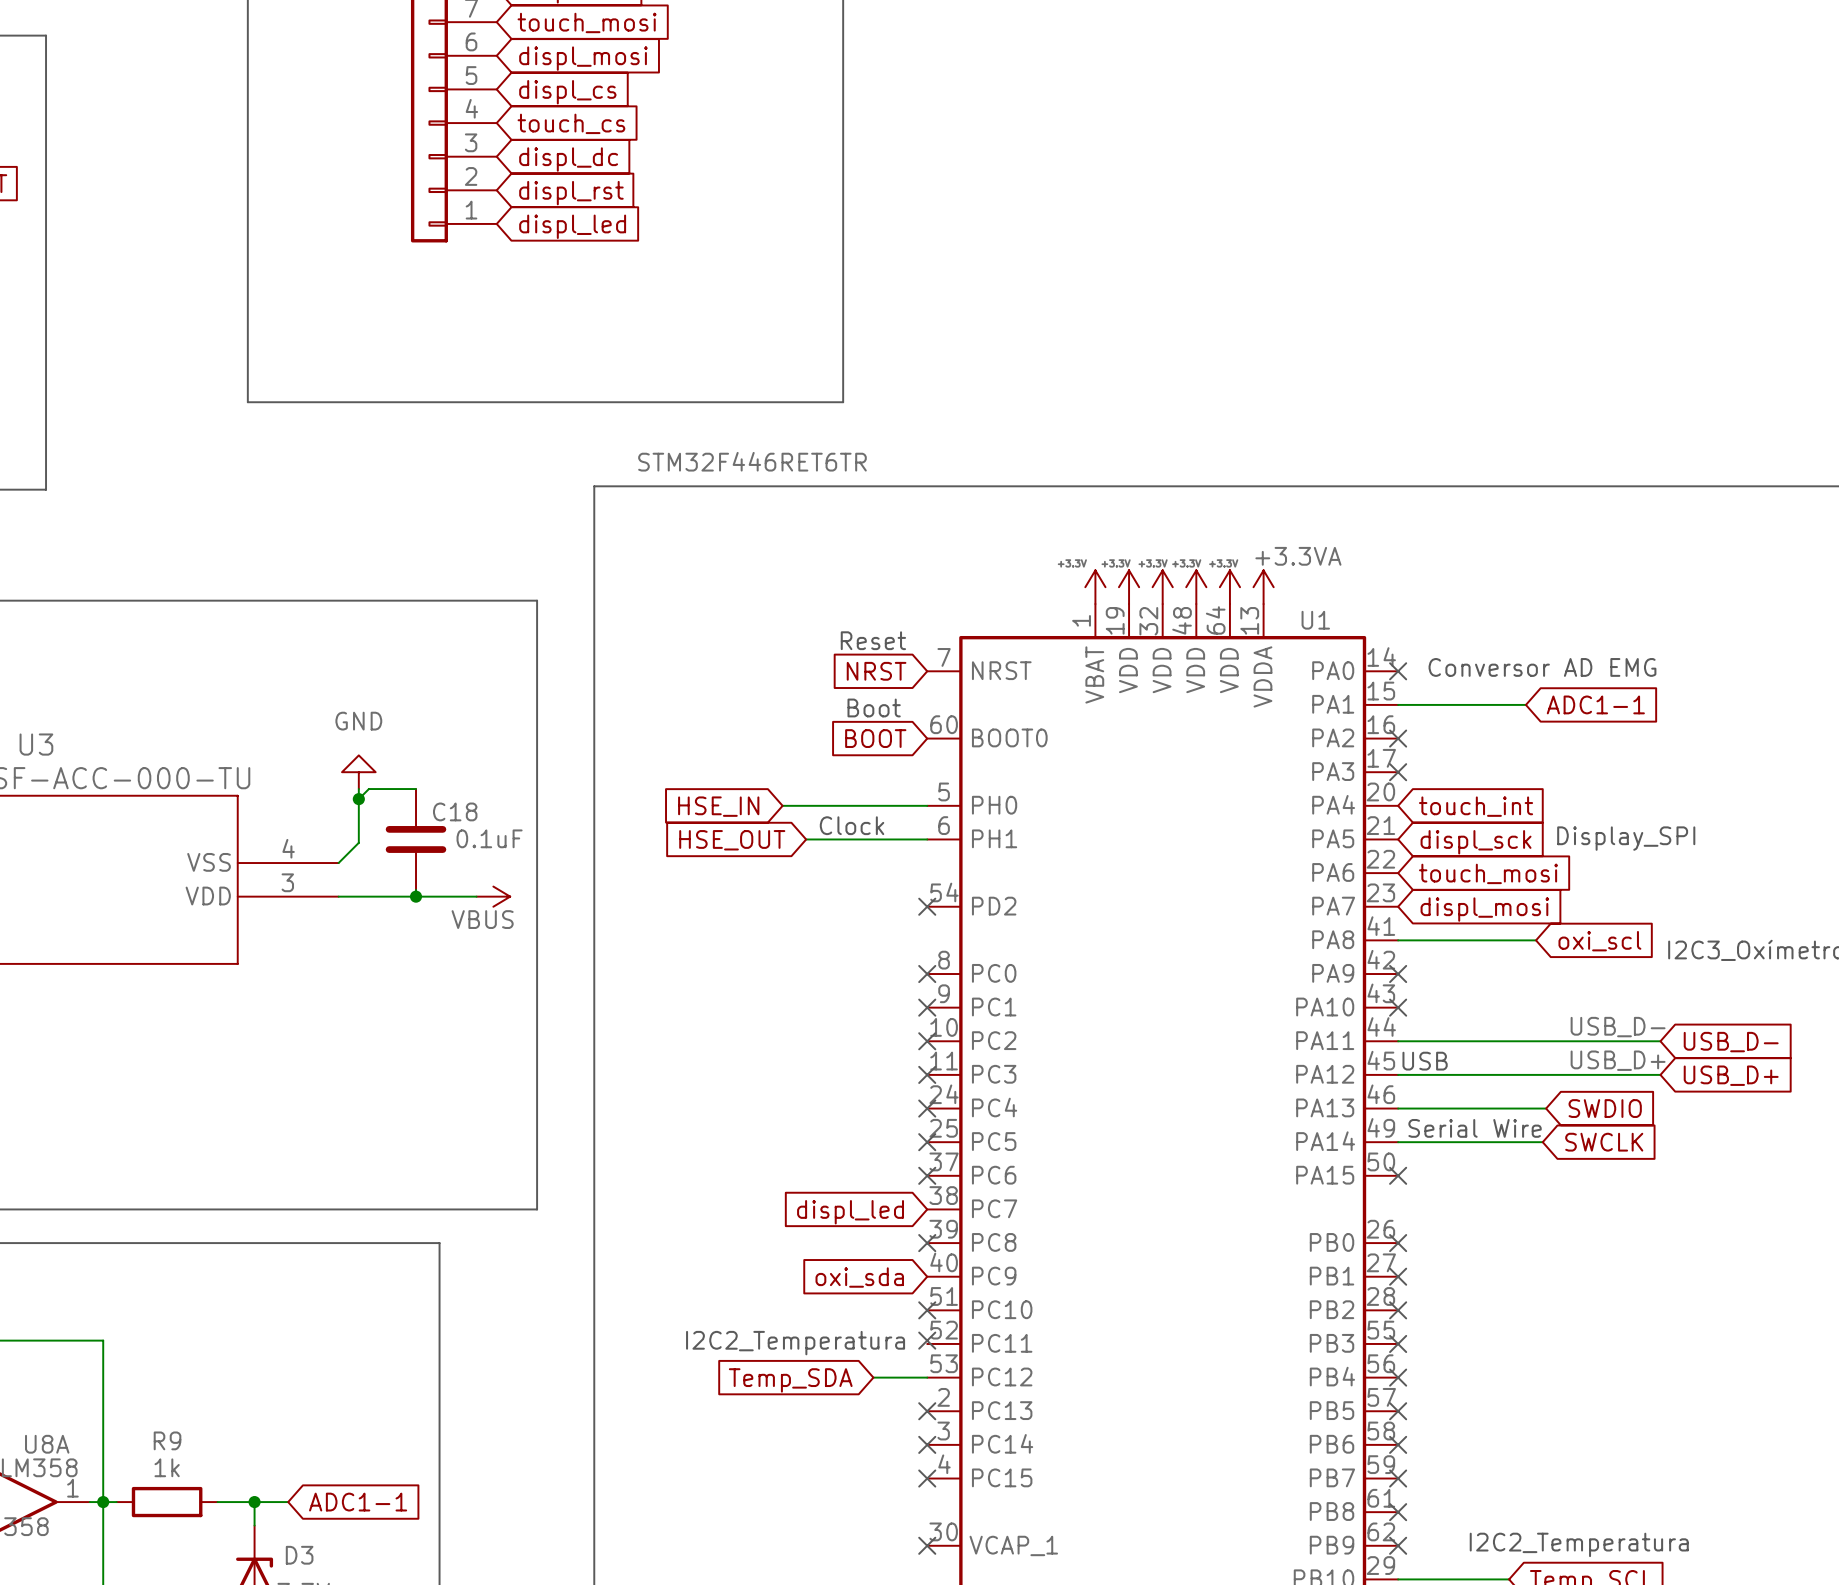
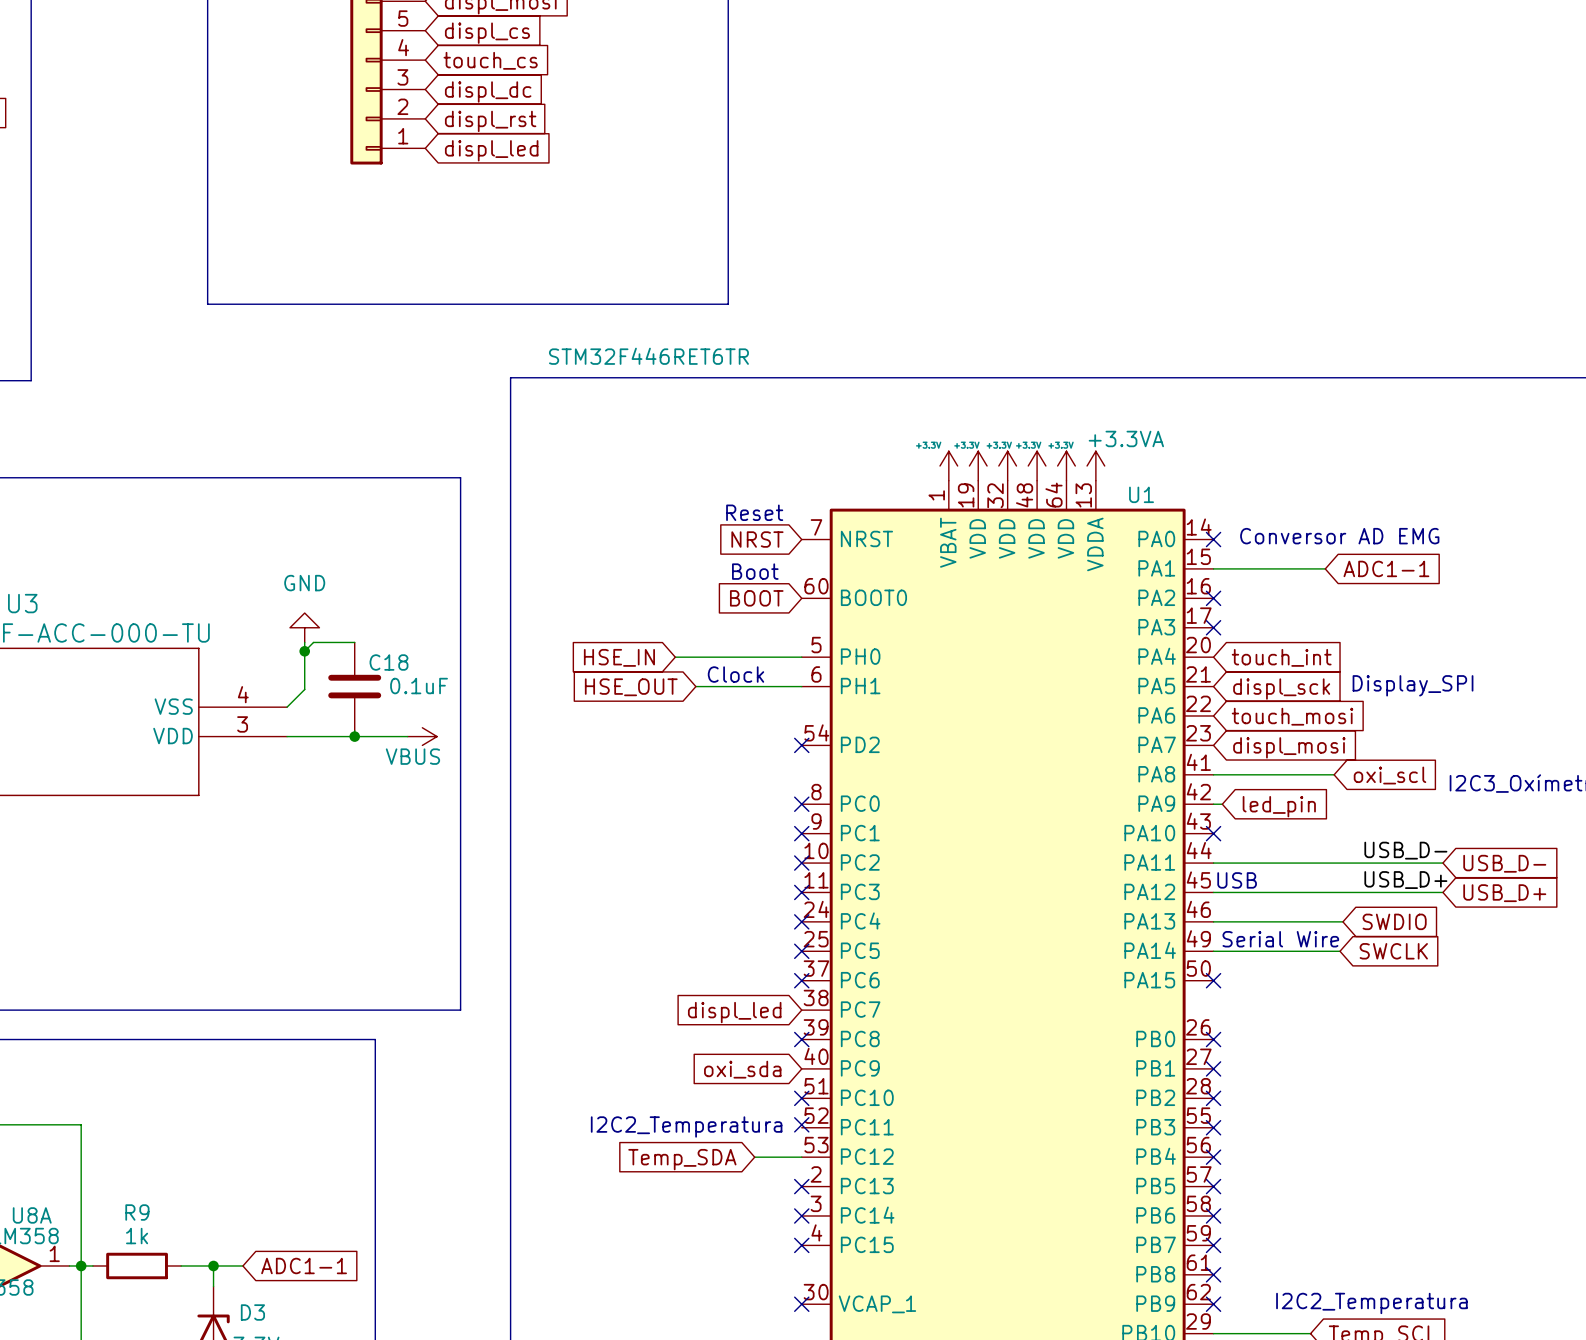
wire: none -> (1213, 804) (1222, 804)
no-connect mark: (1398, 974) -> none
global label: none -> led_pin (1279, 806)

